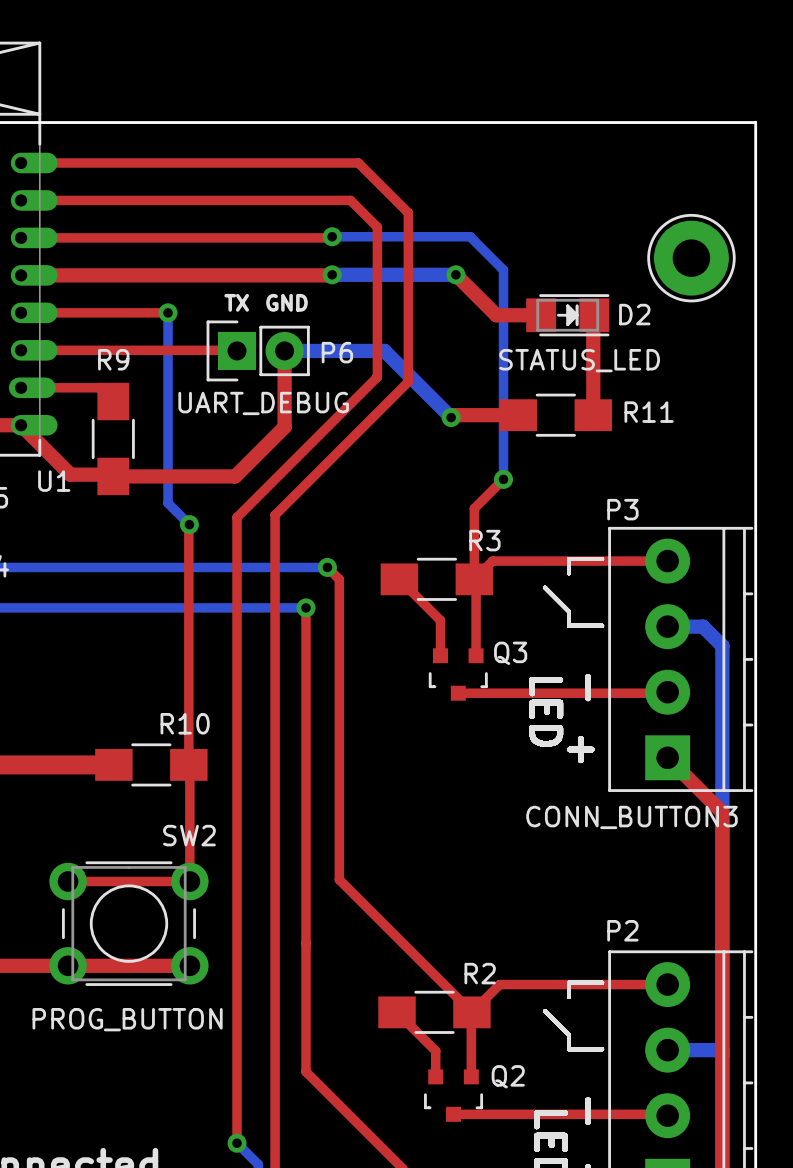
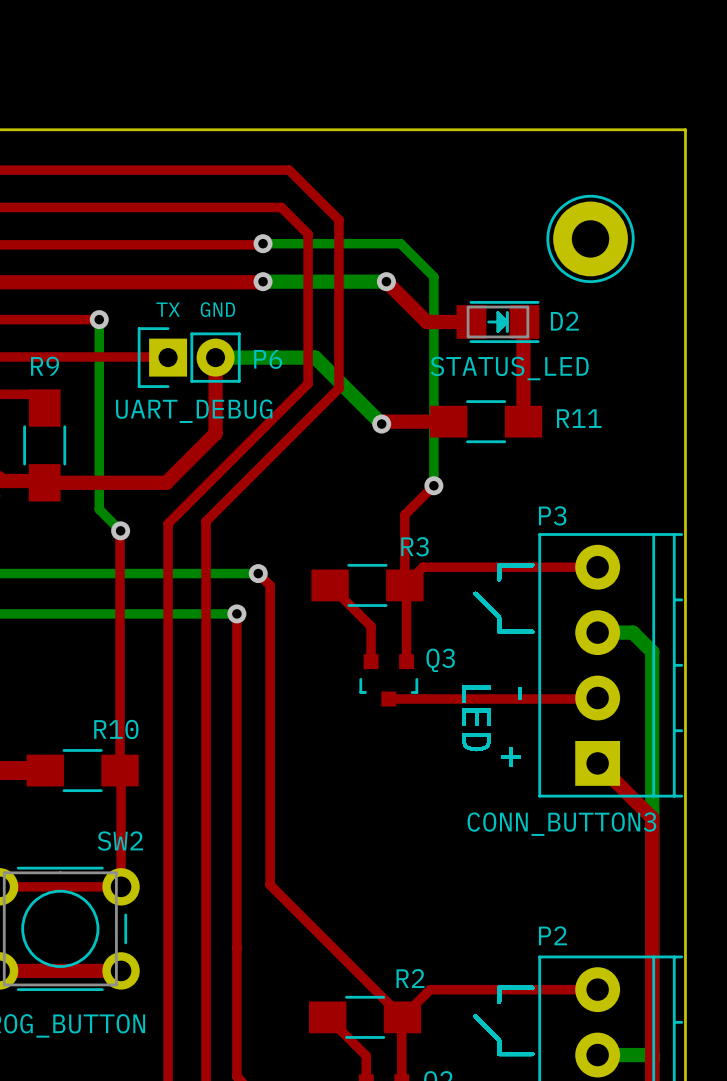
part position: (691, 258) -> (590, 238)

